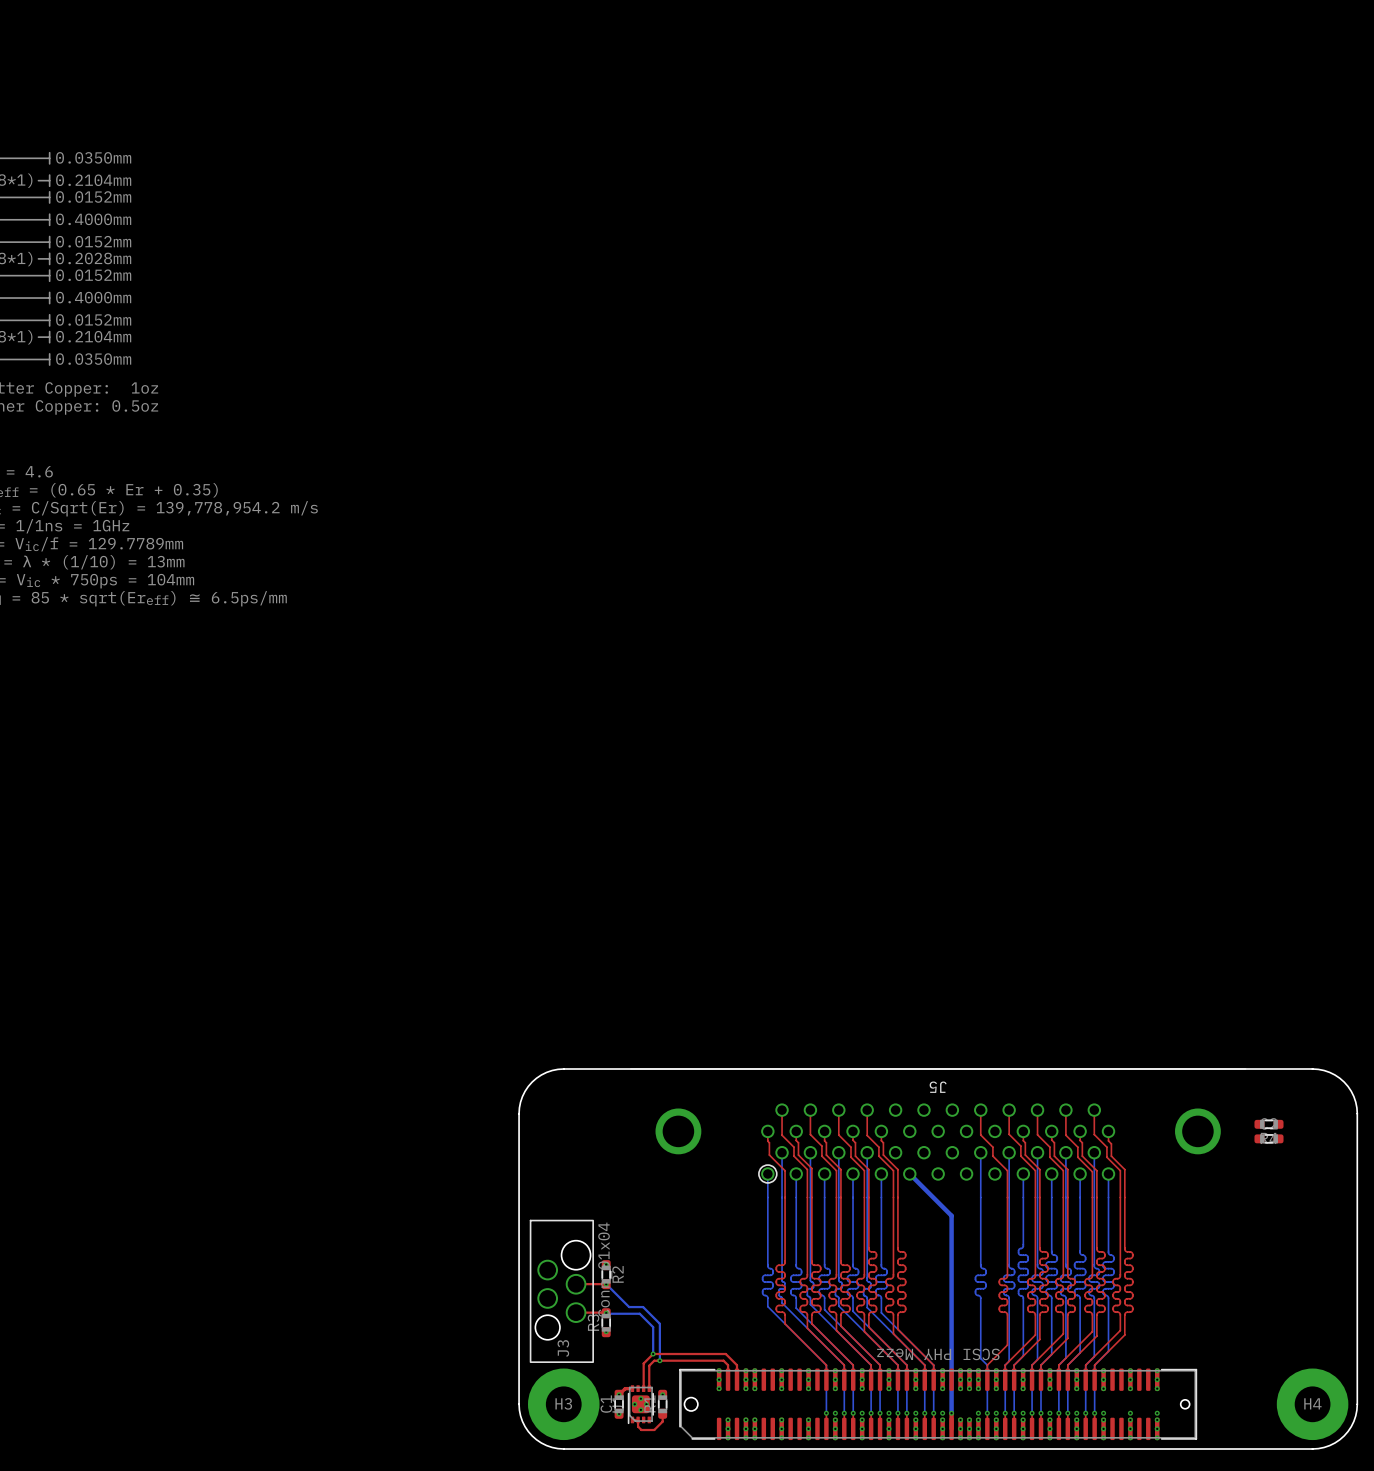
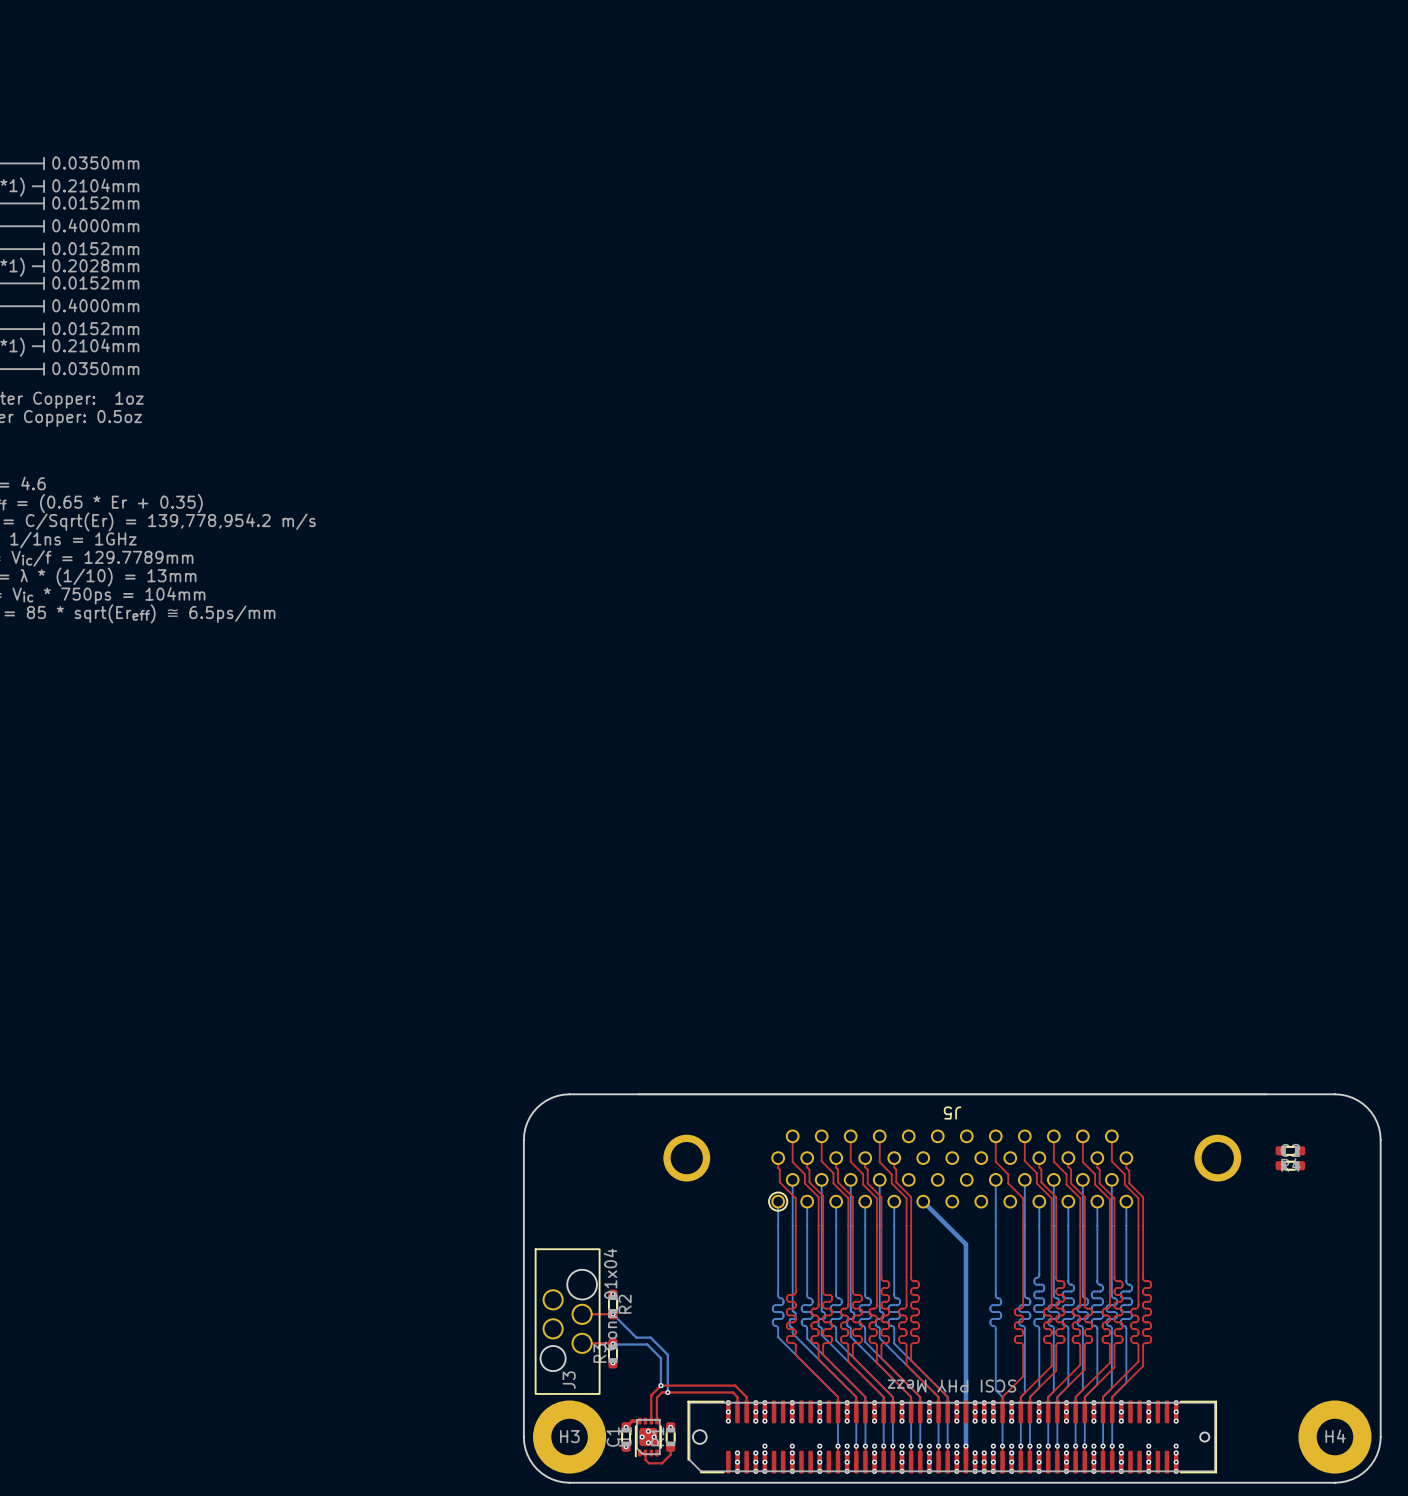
via: none -> (764, 1446)
via: none -> (792, 1446)
via: none -> (819, 1446)

